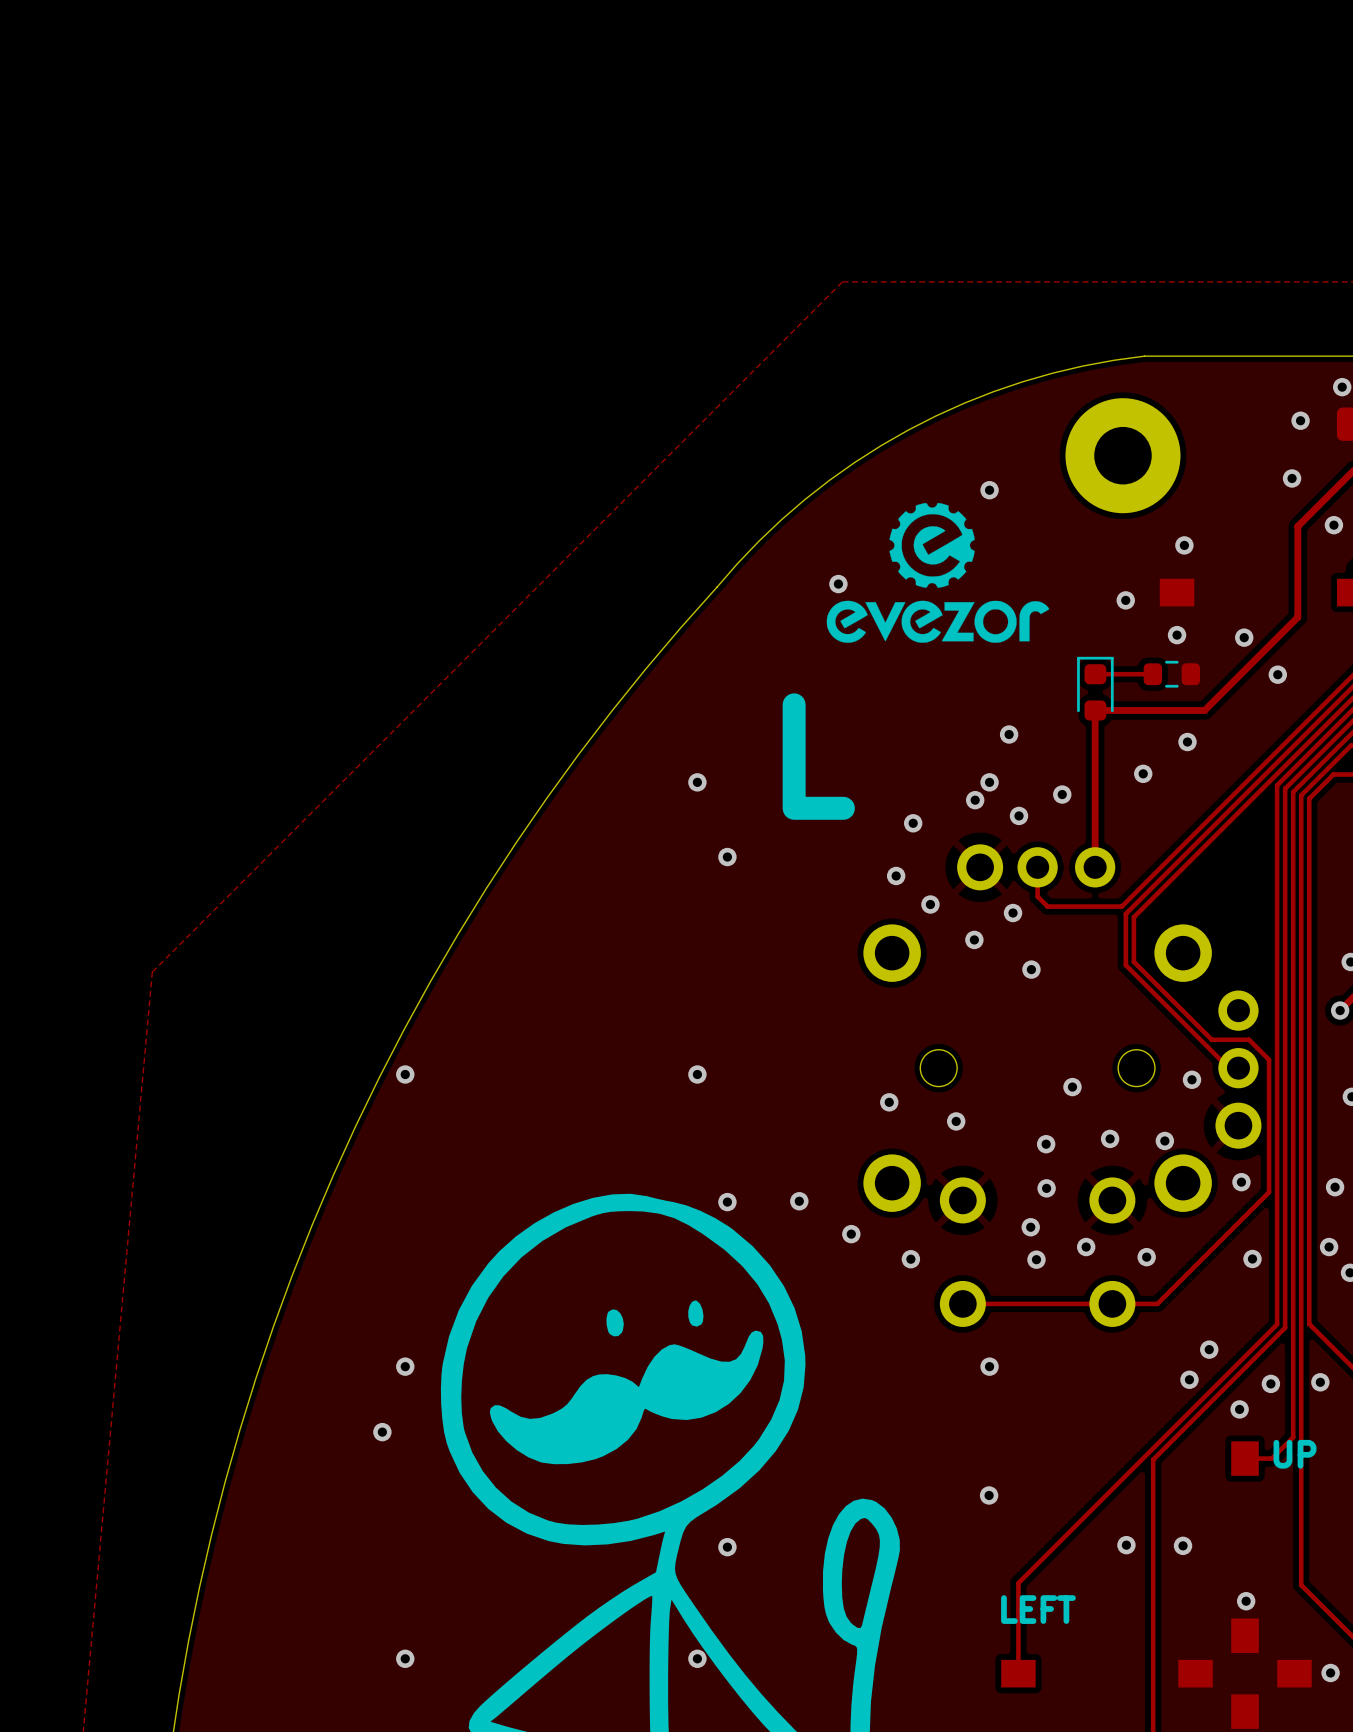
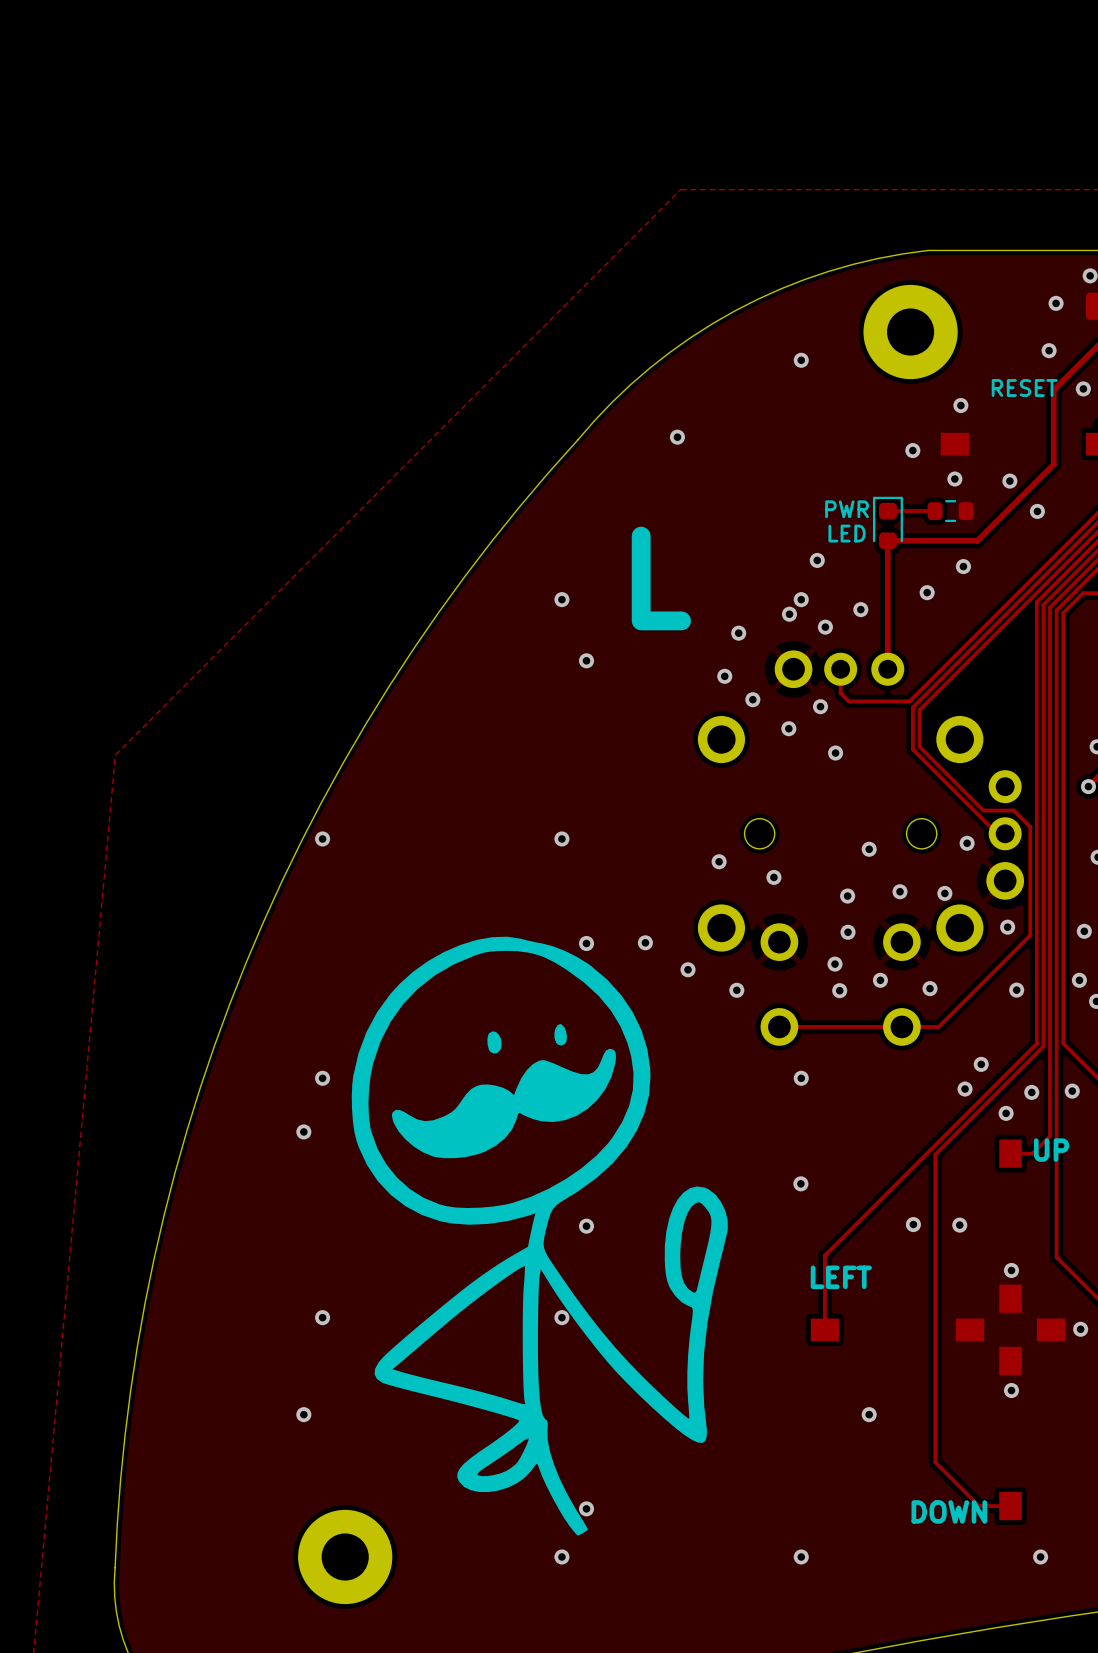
drawing: [826, 502, 1050, 643] -> none
text: none -> RESET (1024, 387)
text: none -> PWR (847, 509)
text: none -> LED (847, 533)

